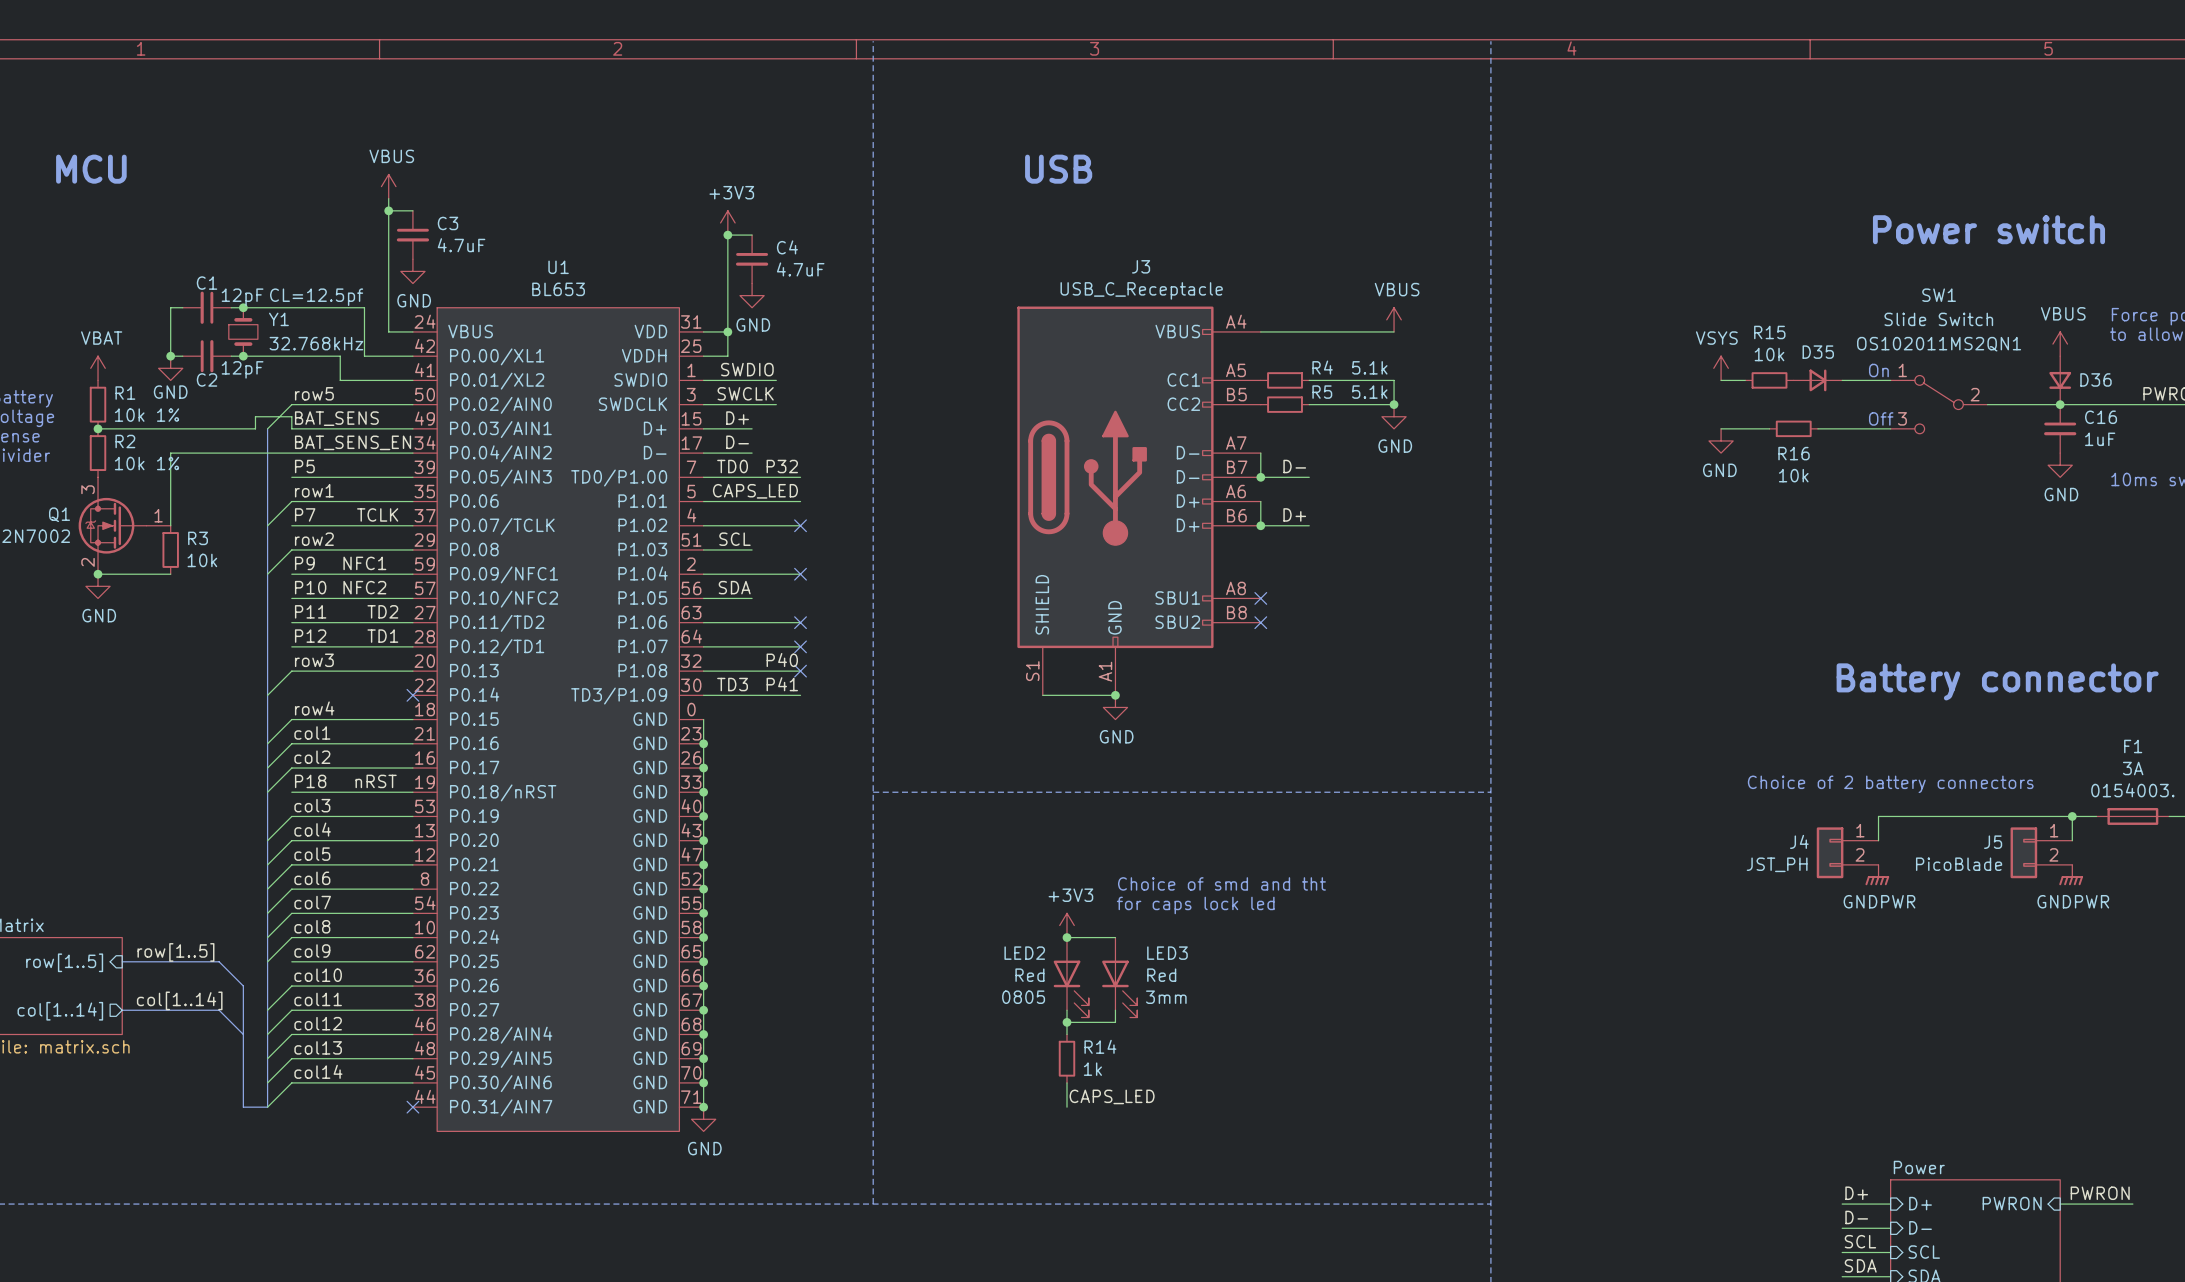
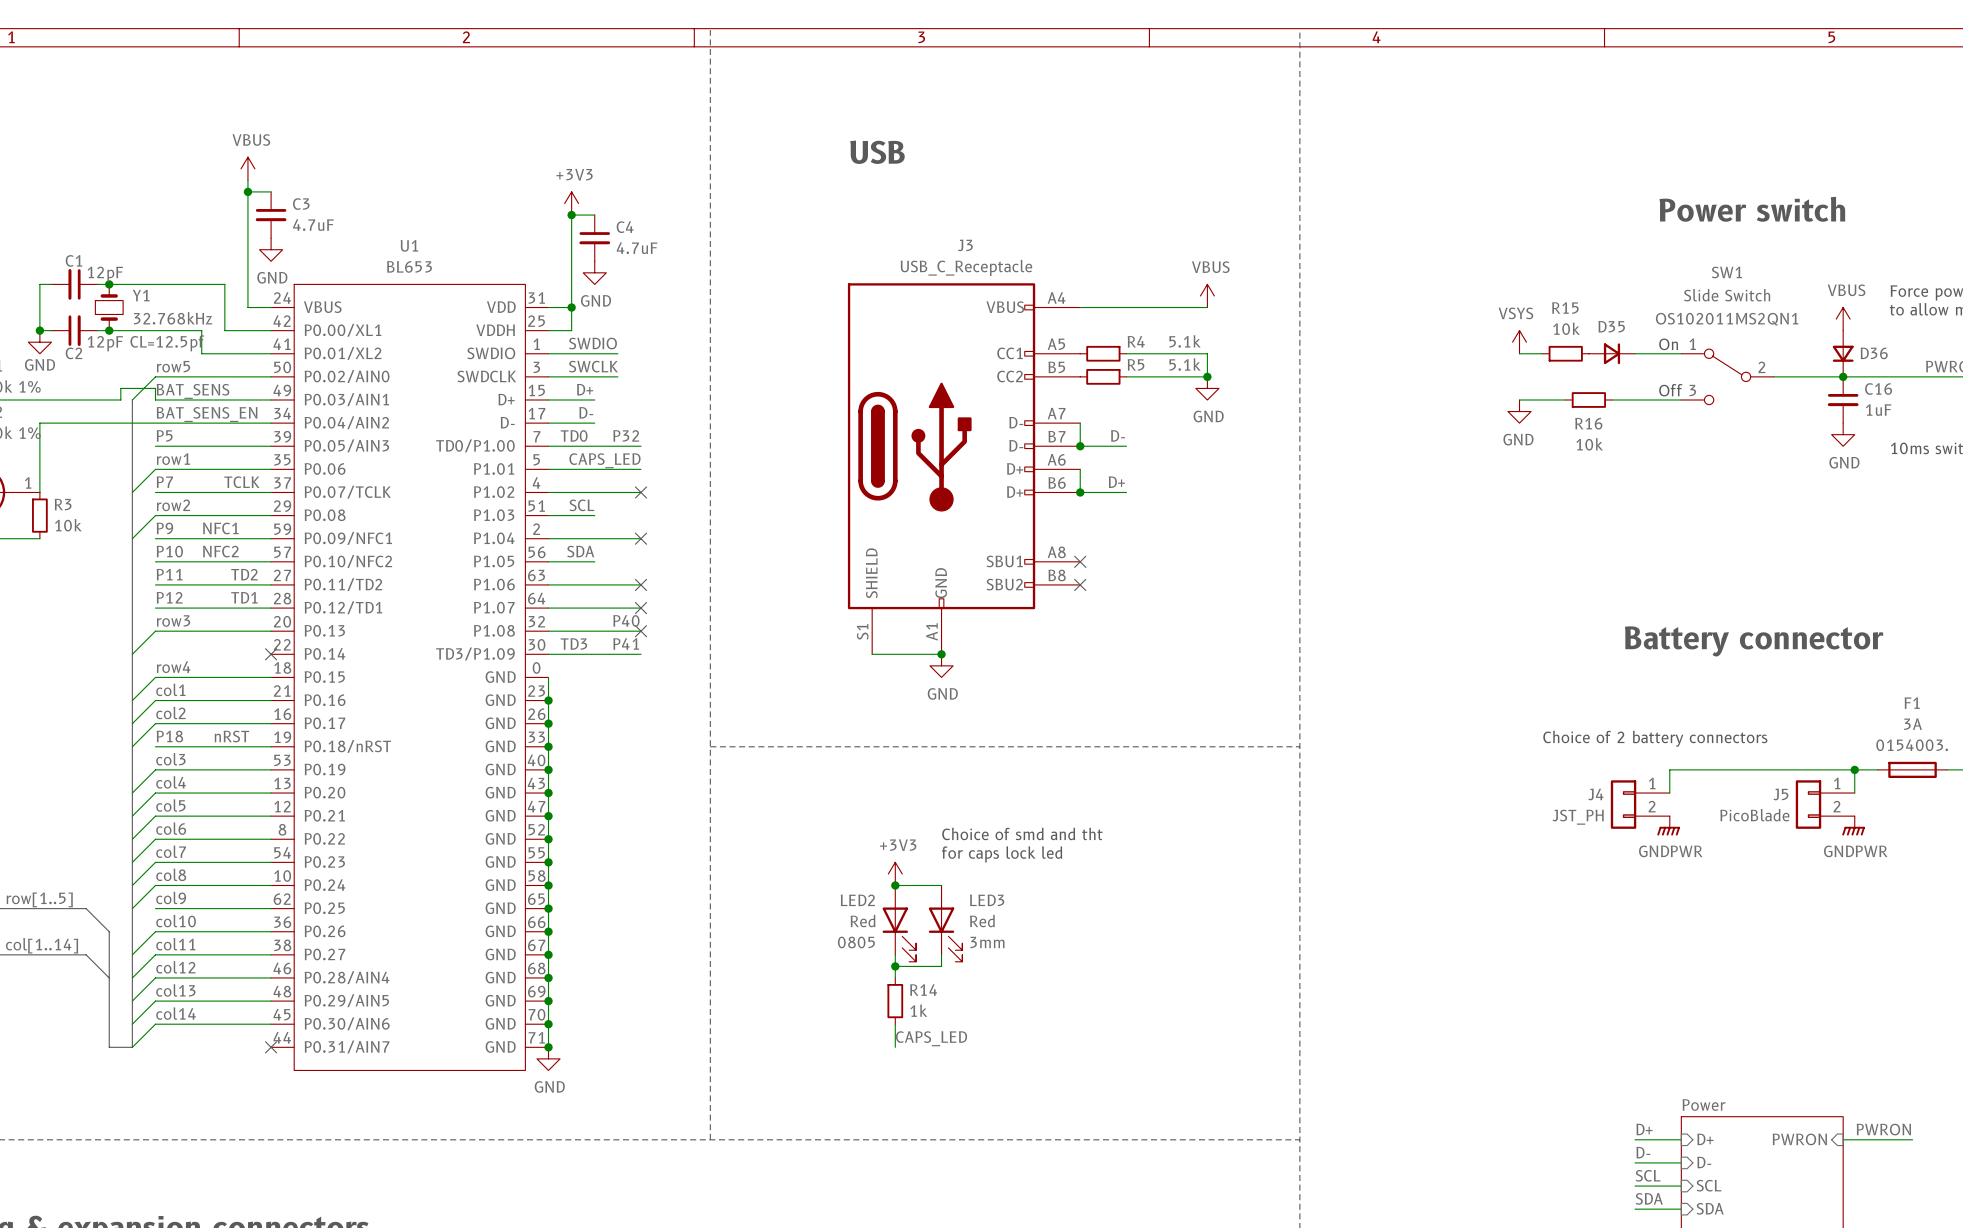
Y1 text position: CL=12.5pf (316, 297) -> CL=12.5pf (167, 343)

